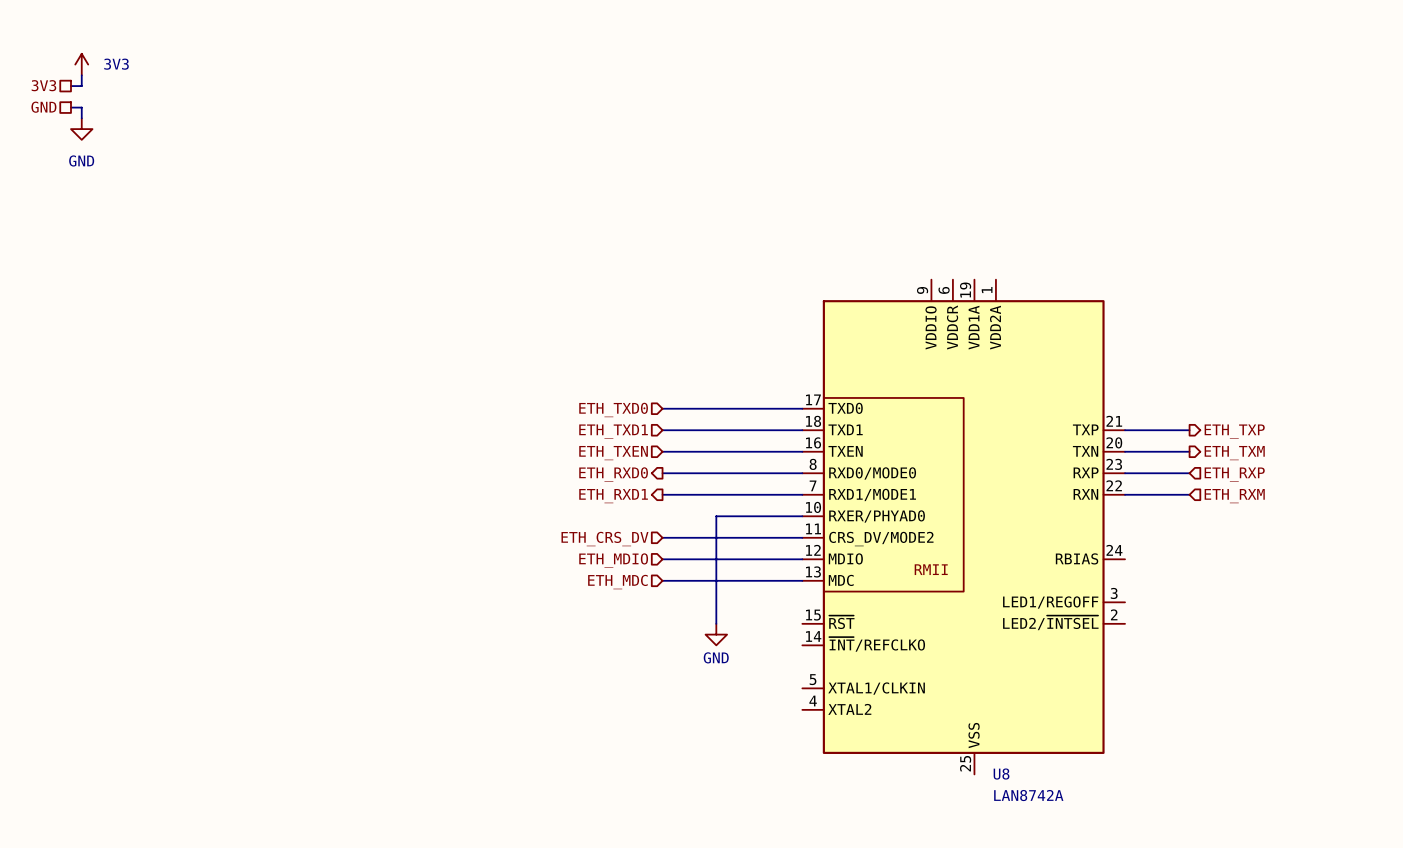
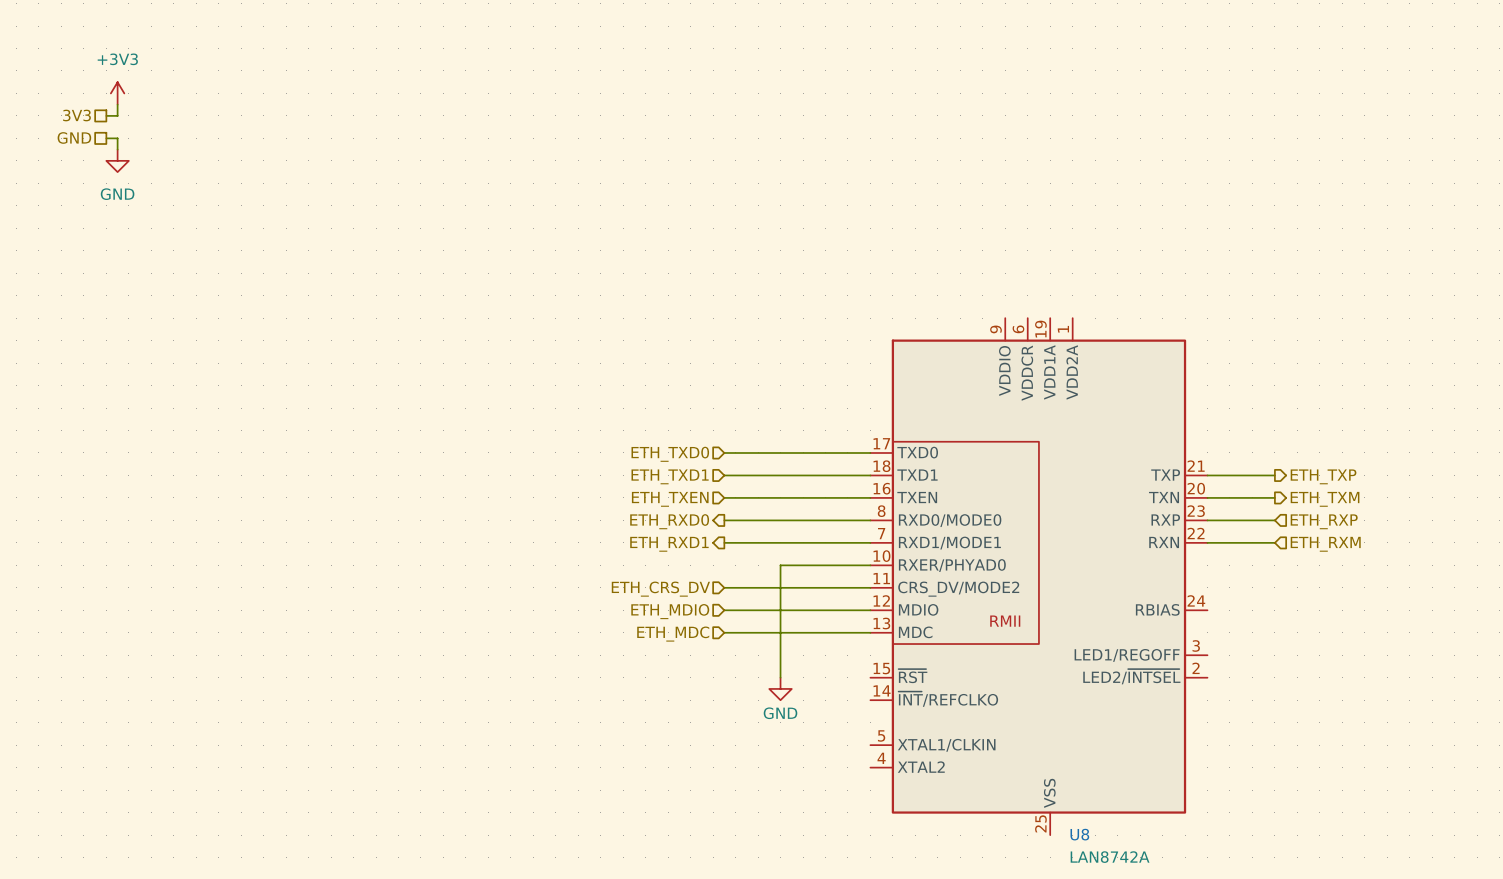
power symbol: 3V3 (81, 64) -> +3V3 (117, 93)

